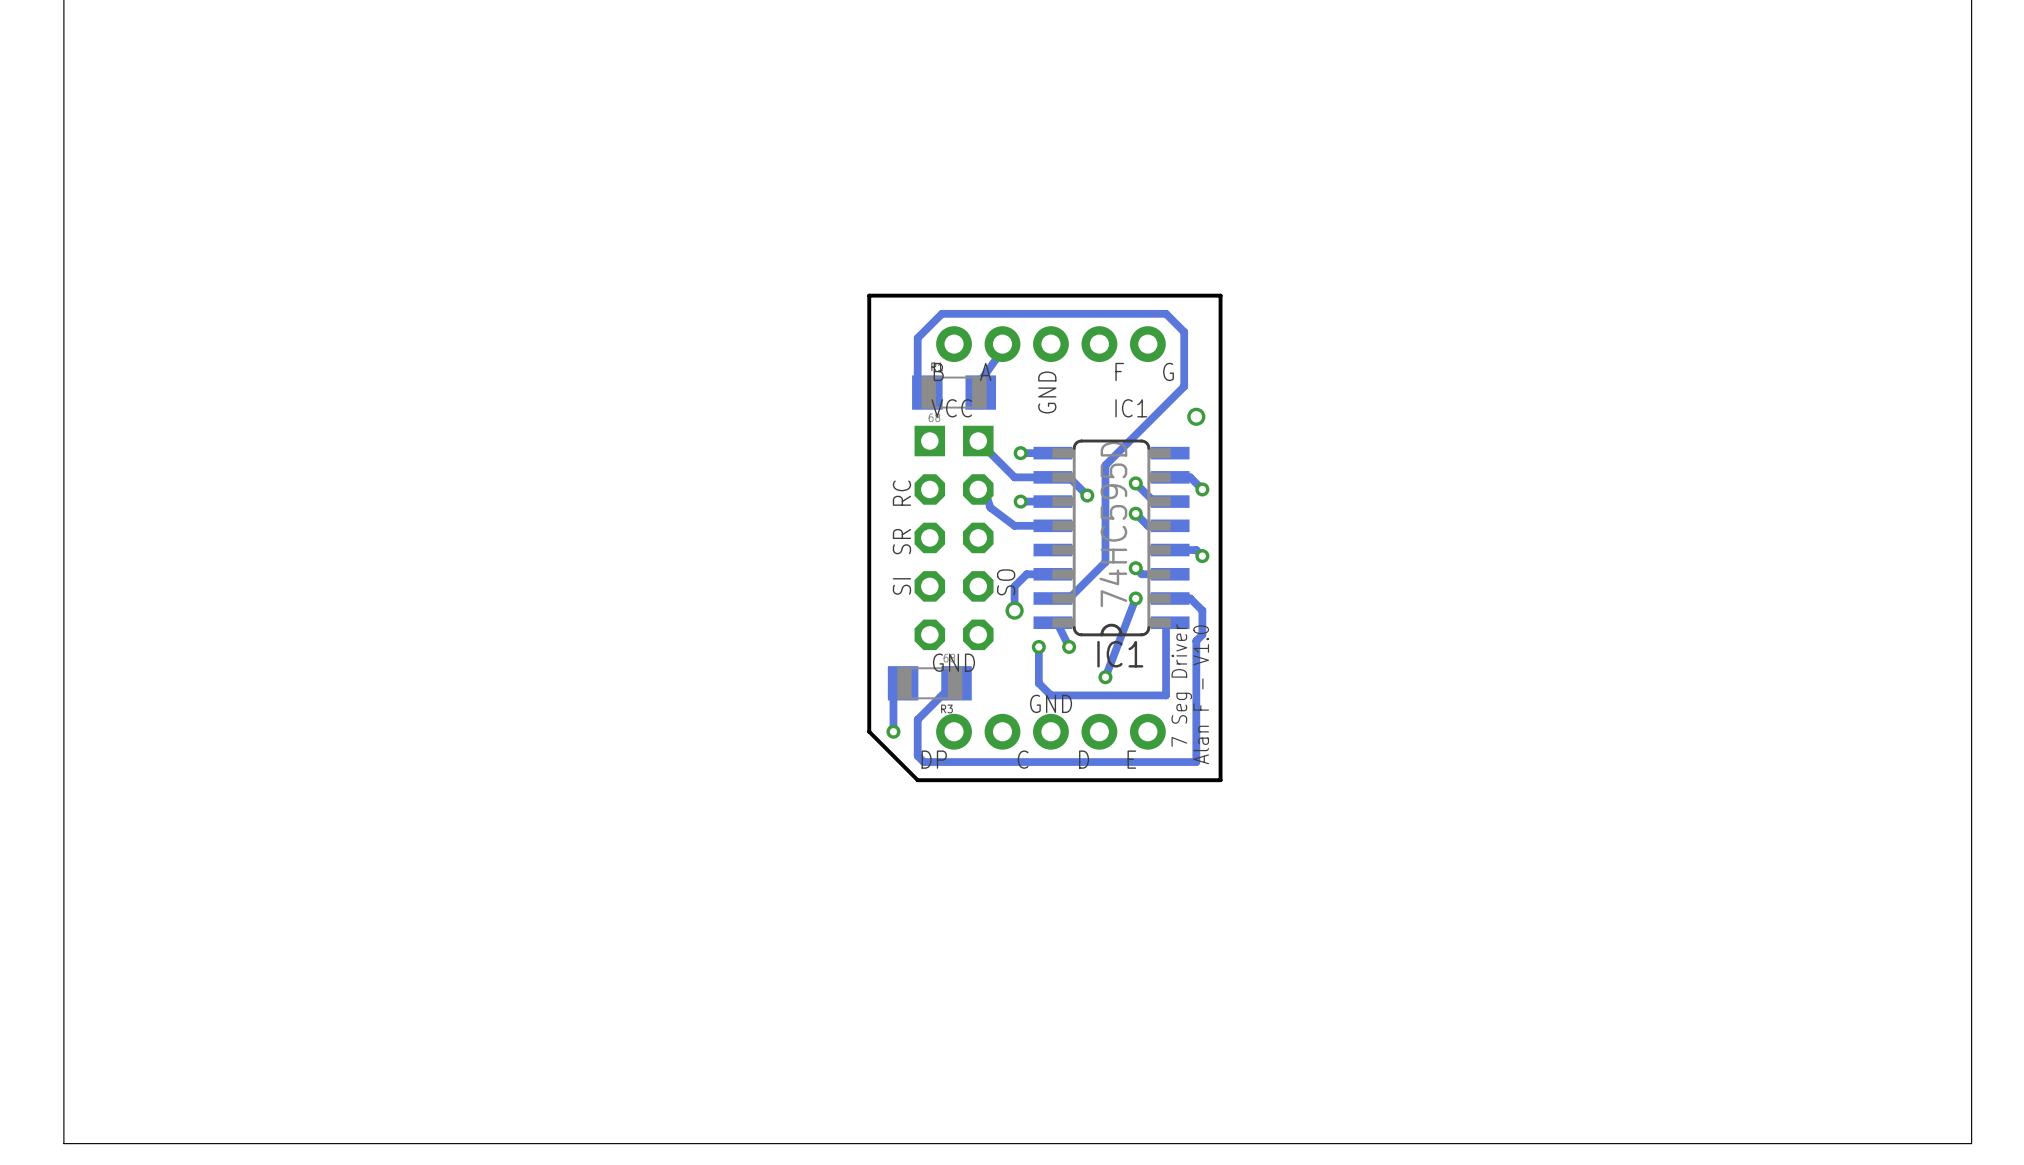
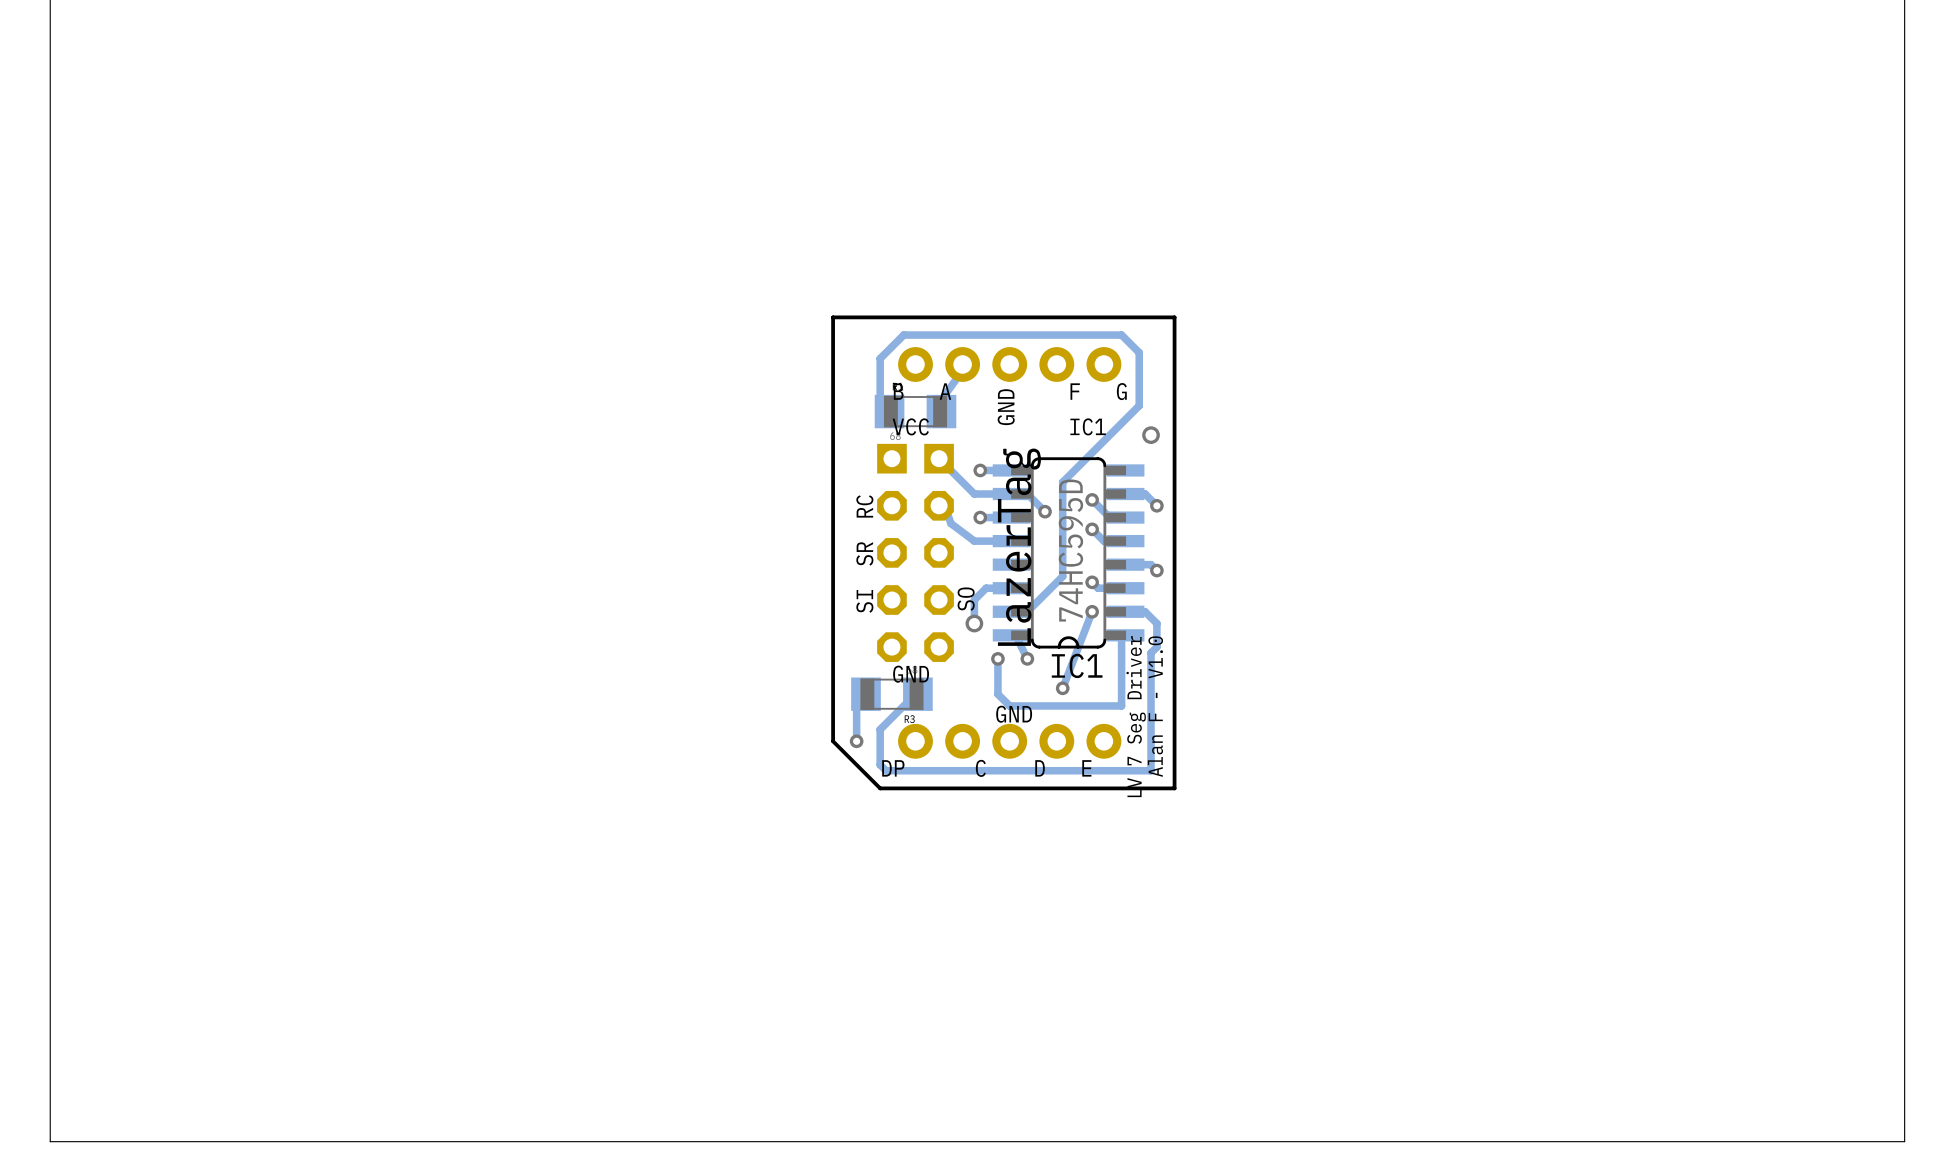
text: none -> LazerTag (1019, 547)
text: 7 Seg Driver (1181, 685) -> LV 7 Seg Driver (1136, 716)

